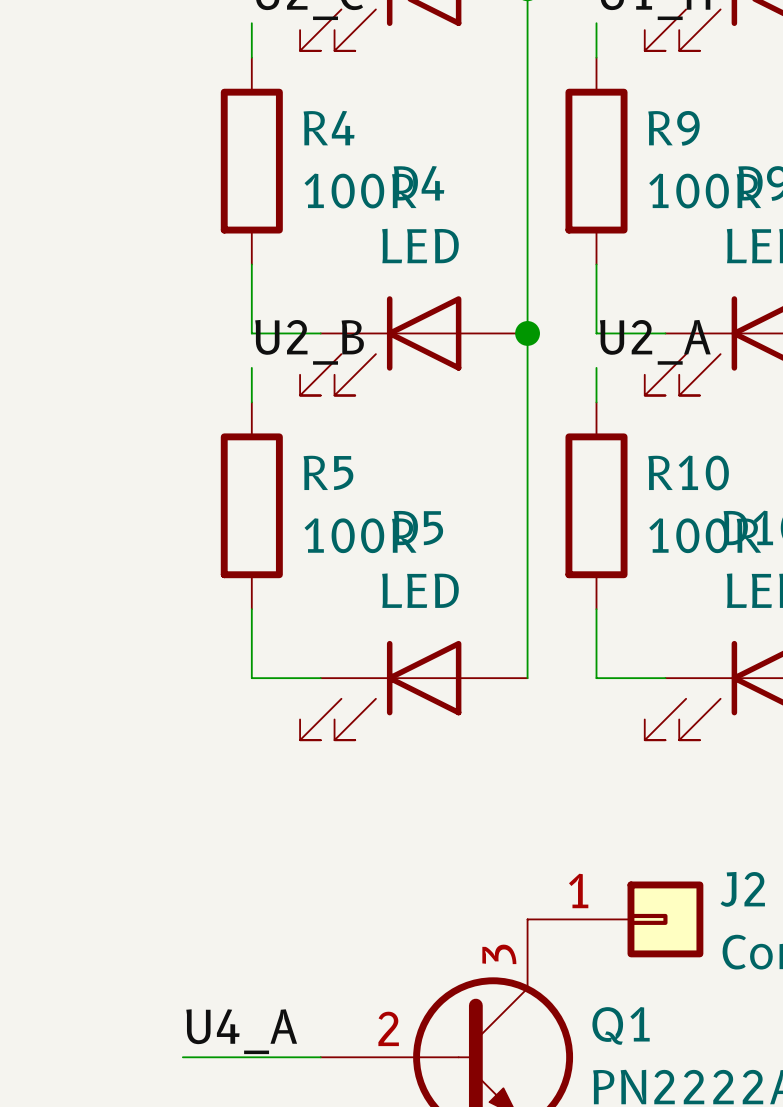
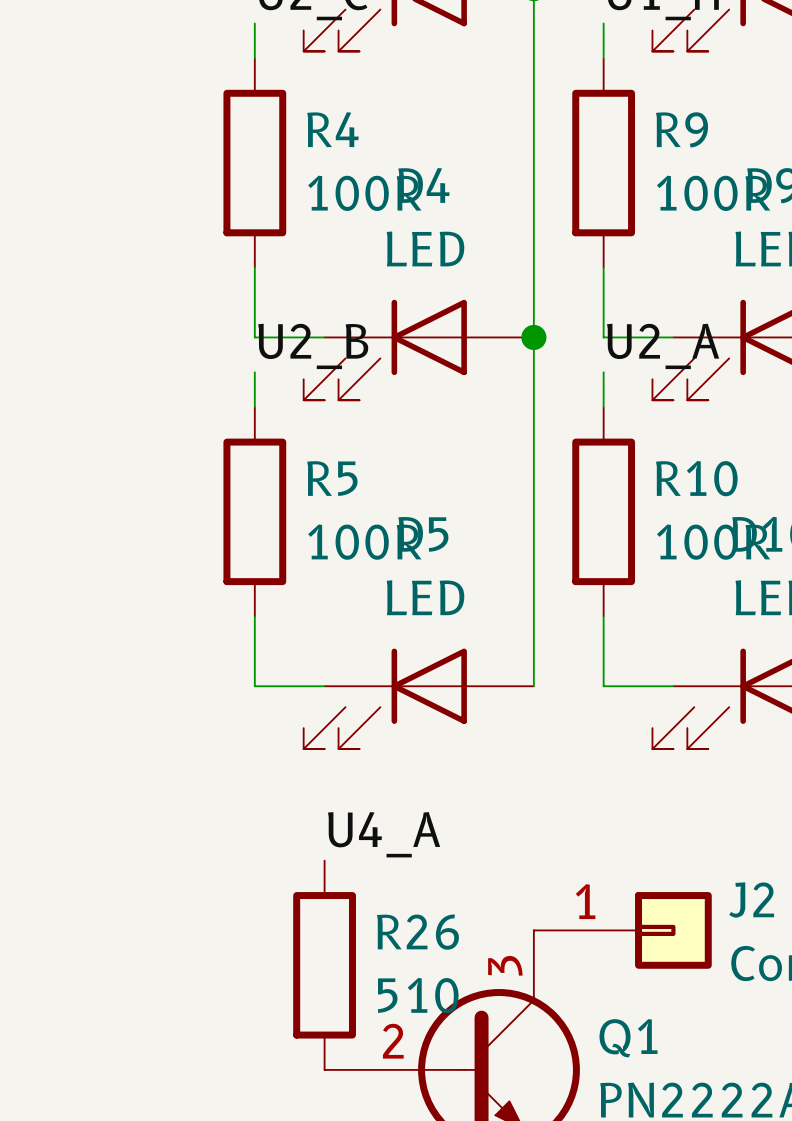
R26: none -> 510 (324, 965)
label position: U4_A (241, 1031) -> U4_A (384, 834)
wire: (182, 1057) (320, 1057) -> none

